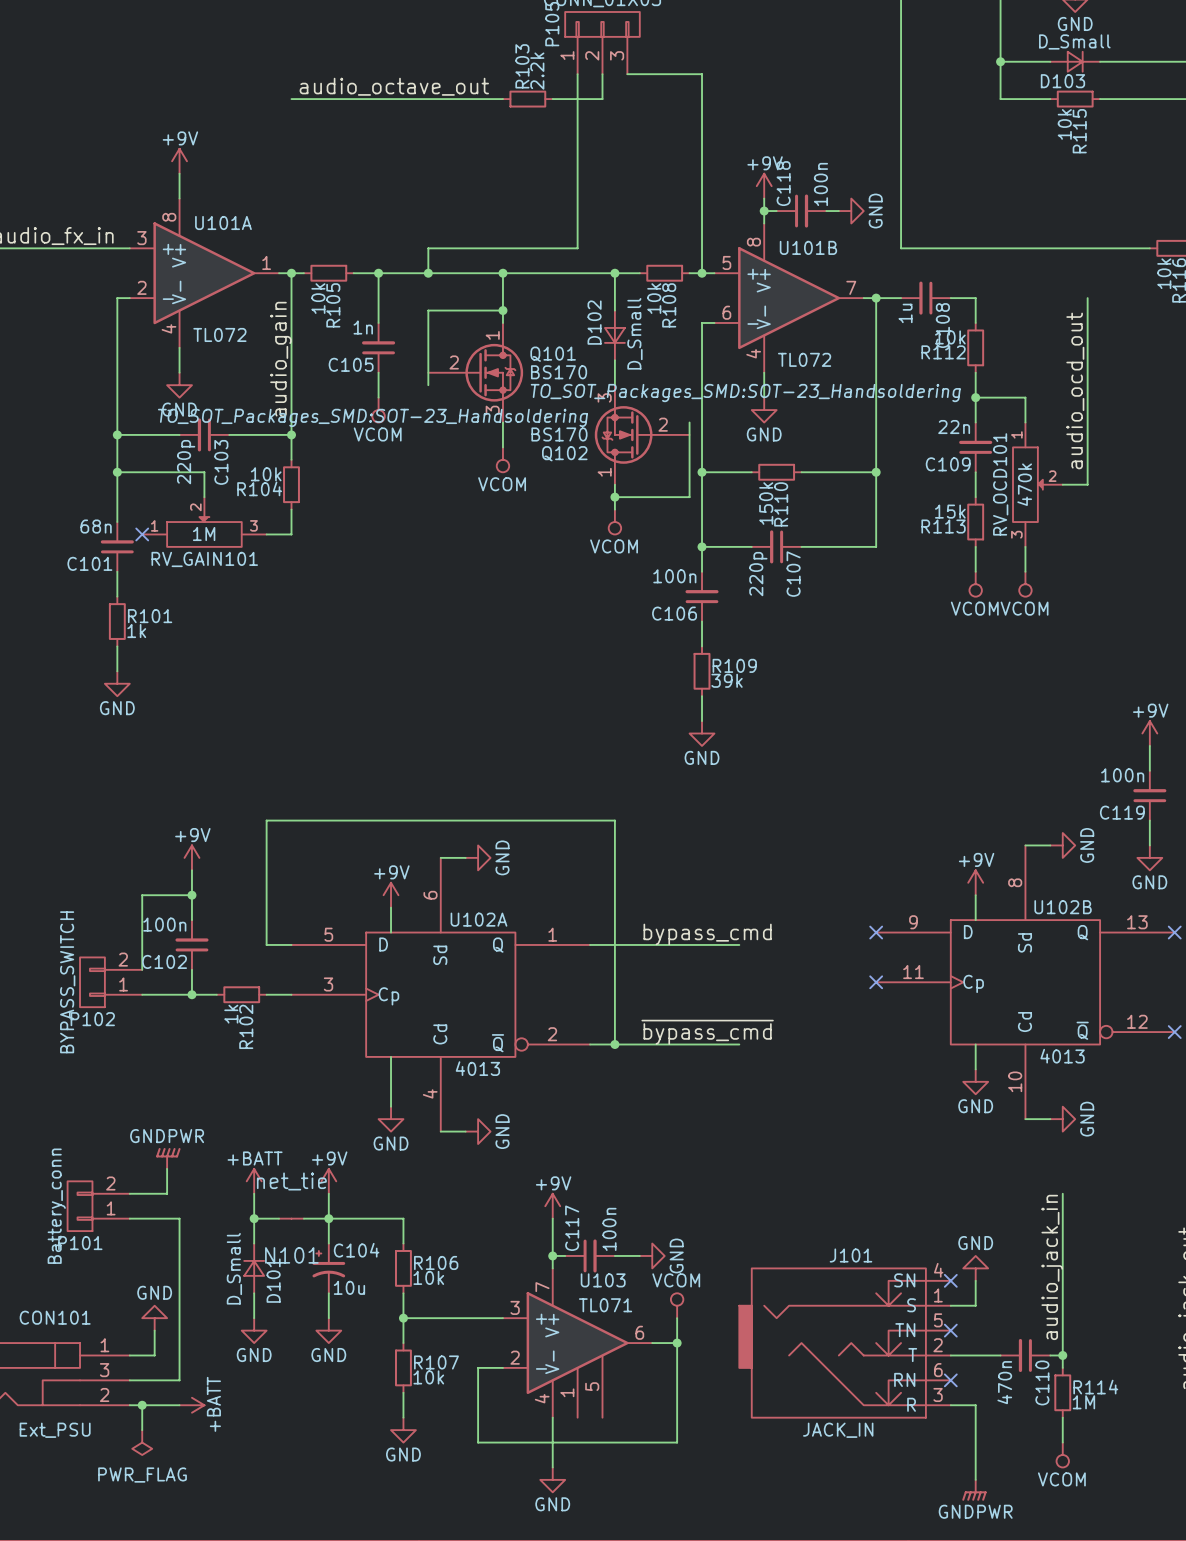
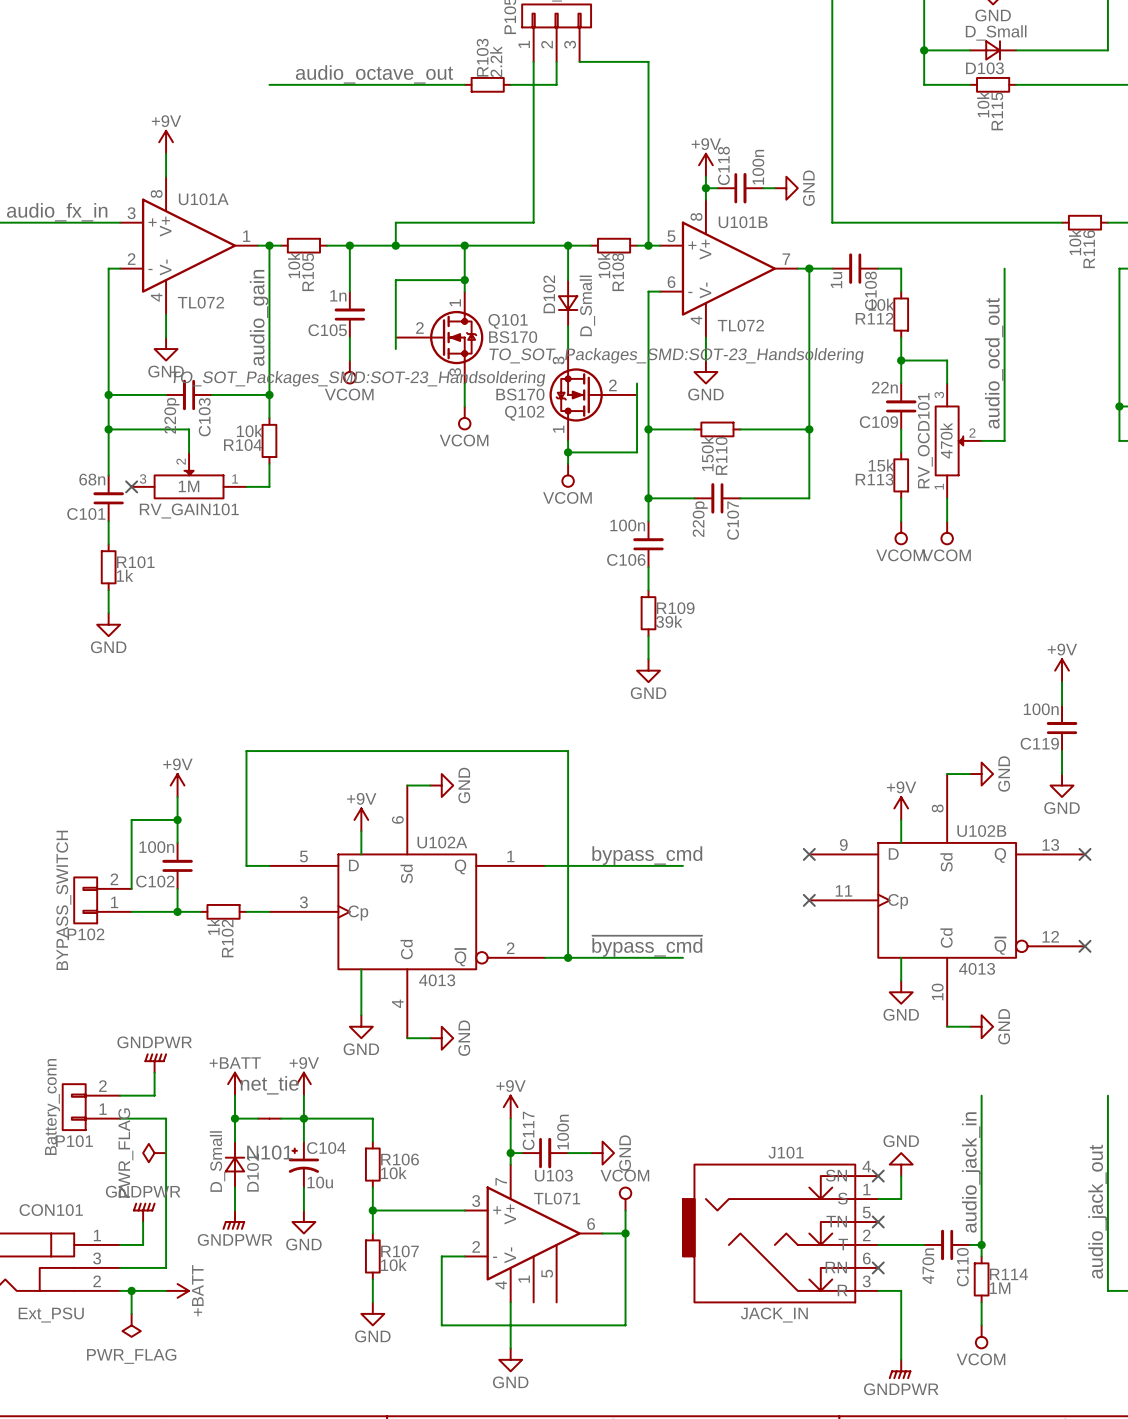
RV_OCD101 flip: as is (1027, 484) -> up-down (949, 440)
RV_GAIN101 flip: as is (204, 531) -> left-right (189, 484)
power symbol: none -> PWR_FLAG (154, 1153)
power symbol: GND (154, 1318) -> GNDPWR (144, 1212)
power symbol: GND (254, 1330) -> GNDPWR (233, 1220)

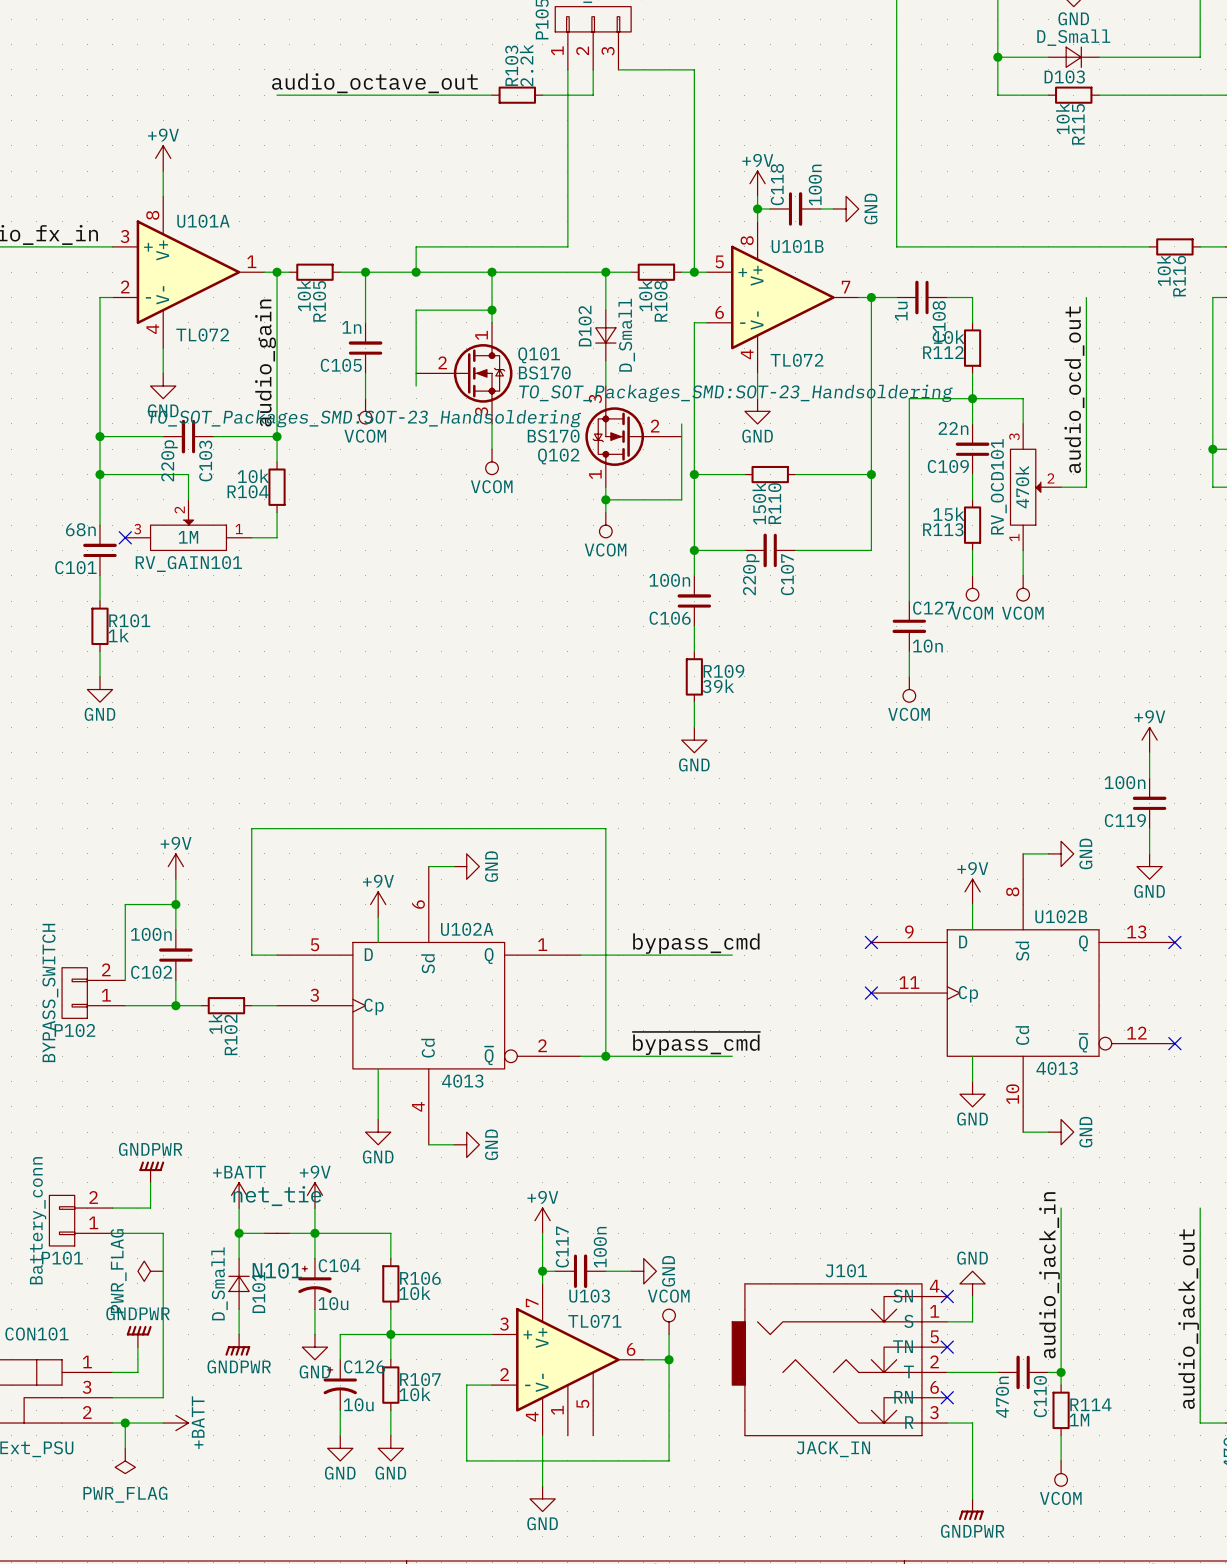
wire: none -> (972, 398) (909, 398) (909, 601)
C127: none -> 10n (909, 626)
wire: none -> (909, 651) (909, 676)
power symbol: none -> VCOM (909, 689)
wire: none -> (390, 1334) (340, 1334) (340, 1359)
C126: none -> 10u (340, 1385)
wire: none -> (340, 1410) (340, 1435)
power symbol: none -> GND (340, 1448)

